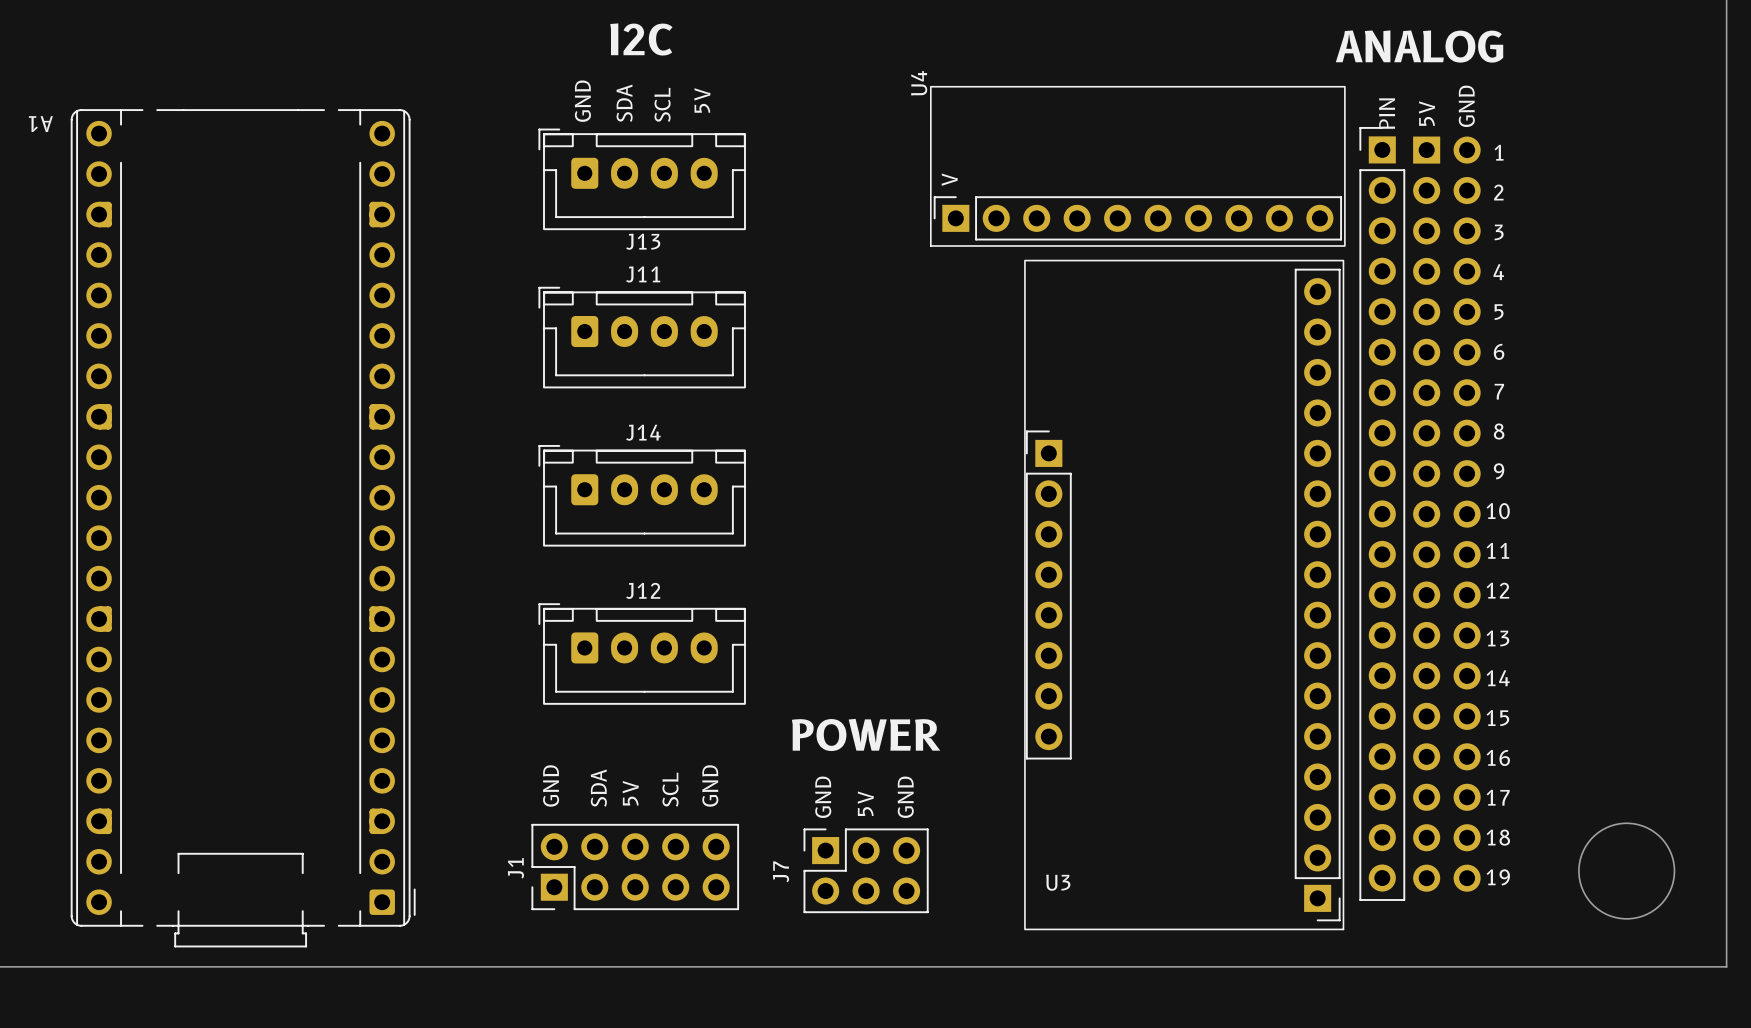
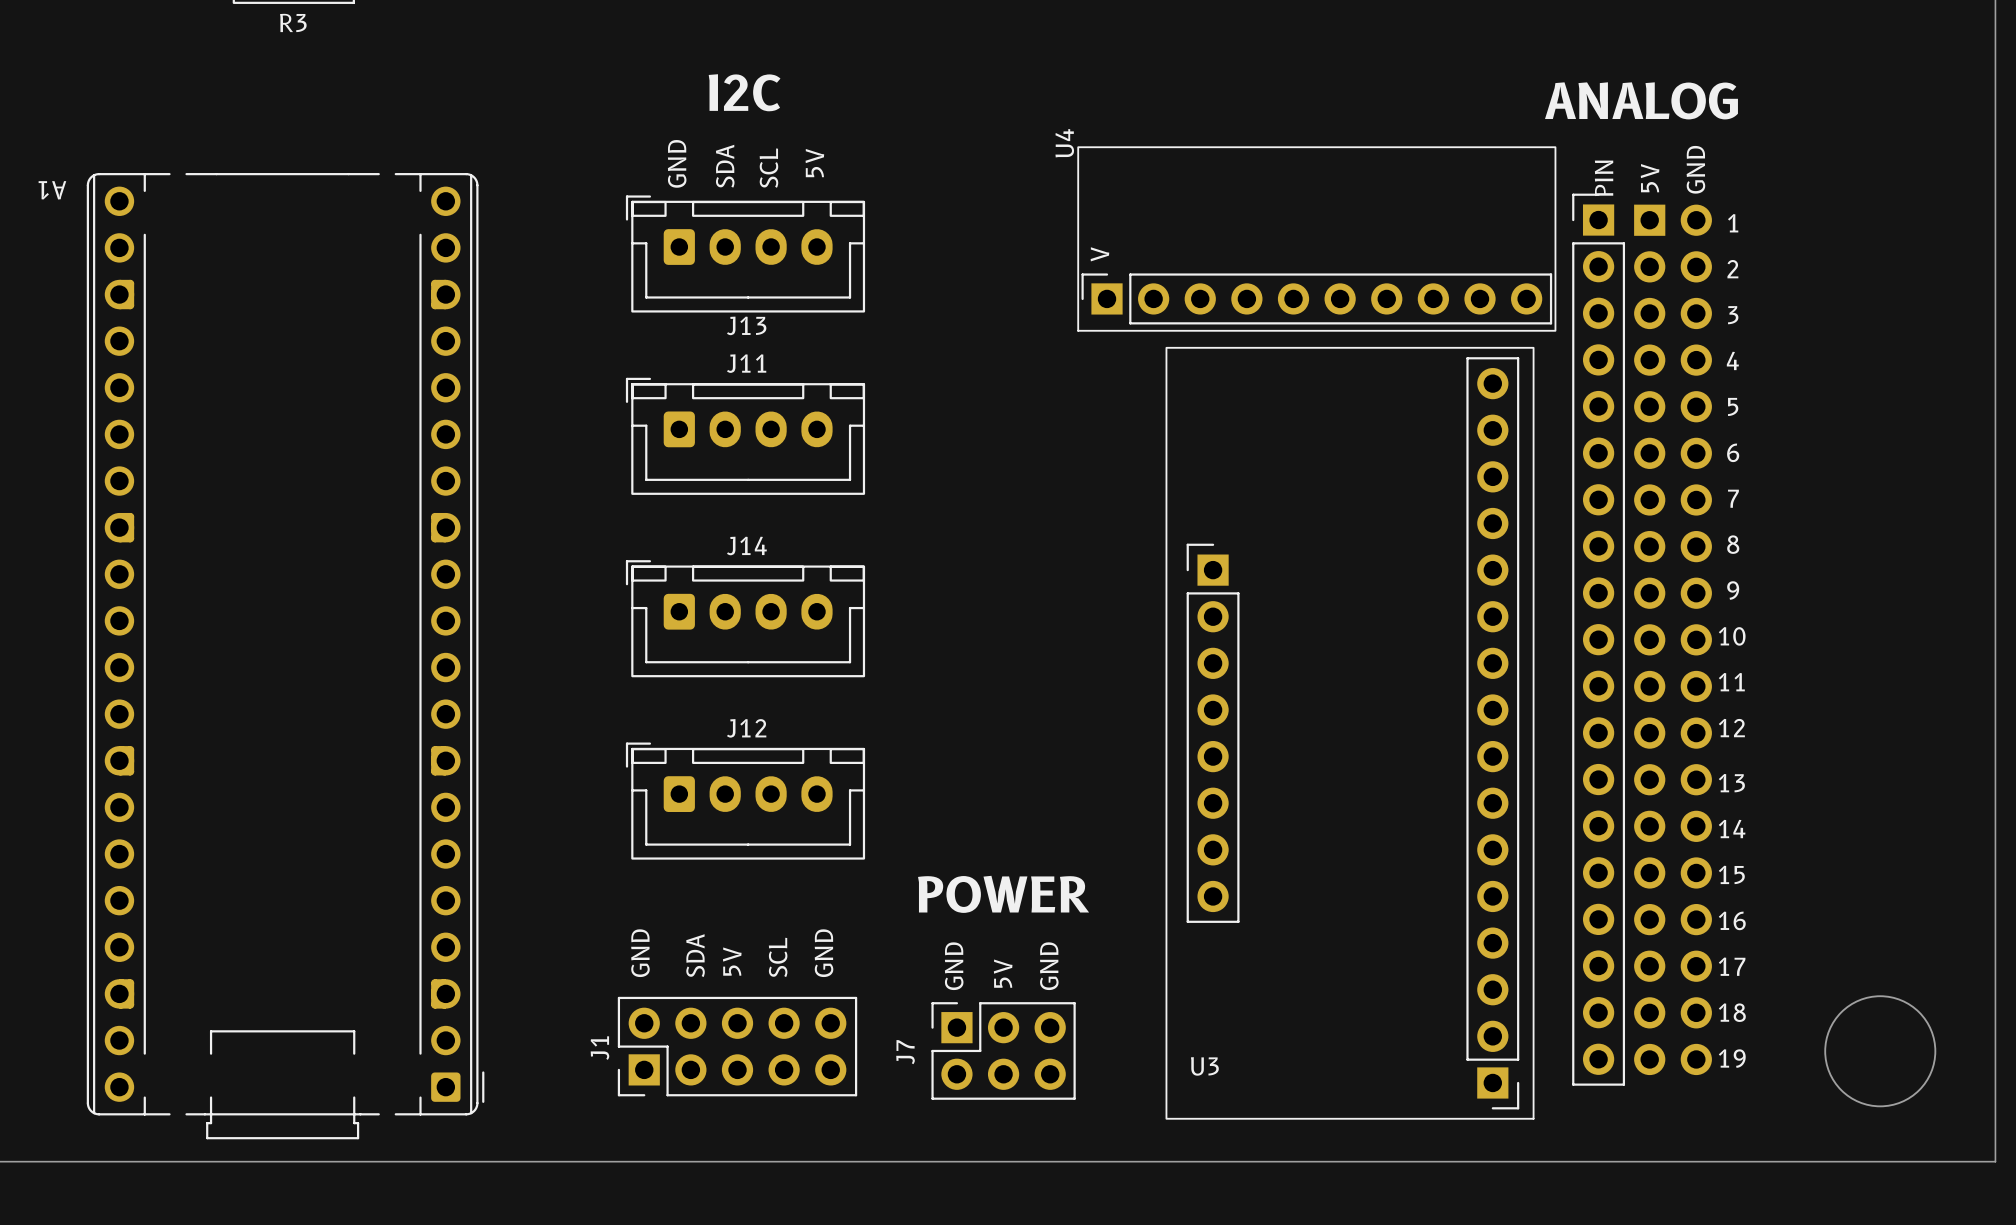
U3 footprint: [1024, 259, 1345, 931] -> [1165, 346, 1535, 1120]

